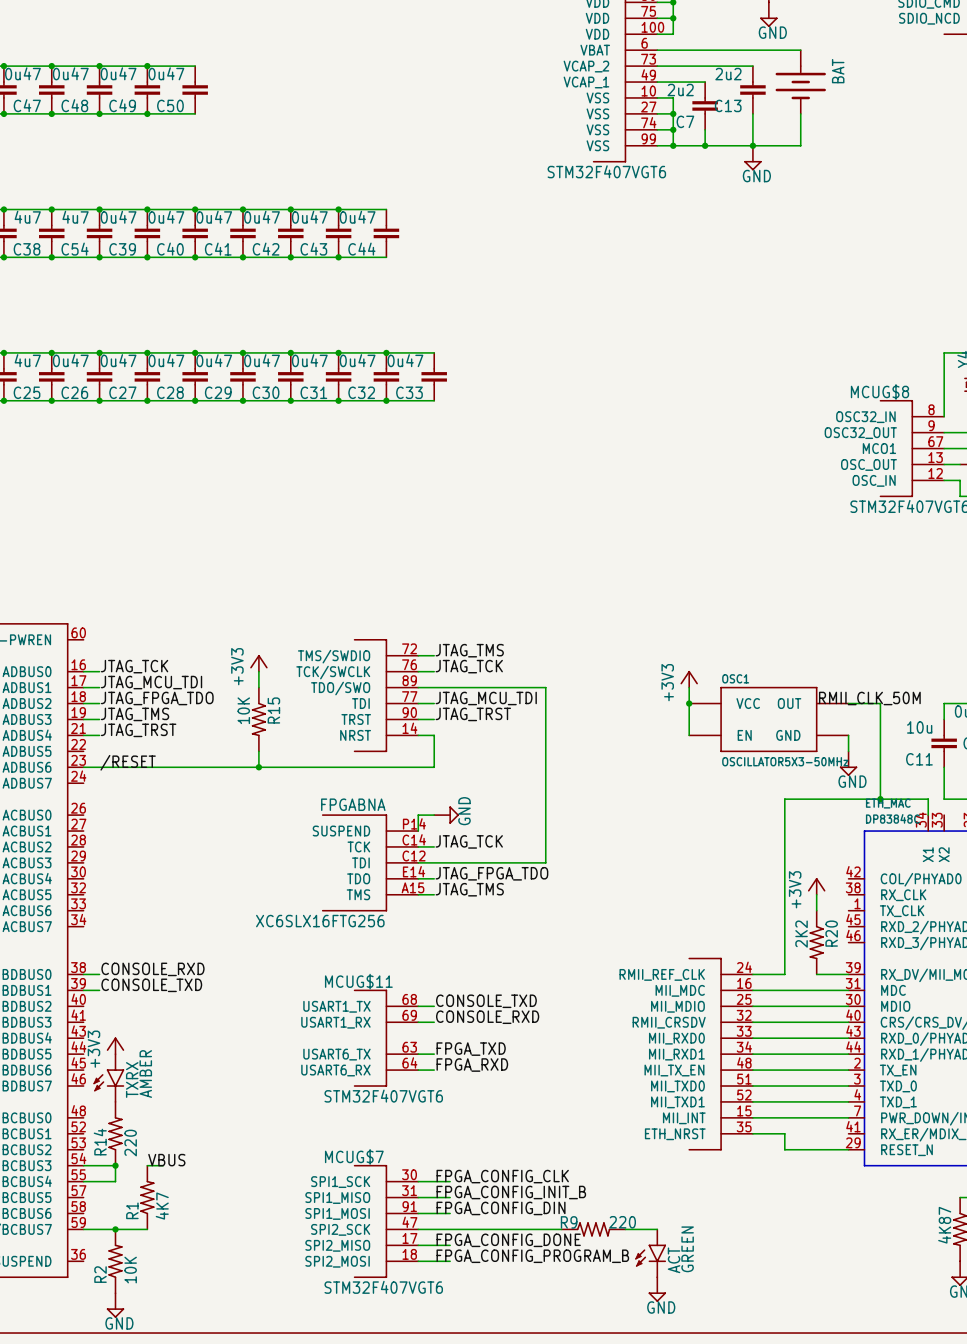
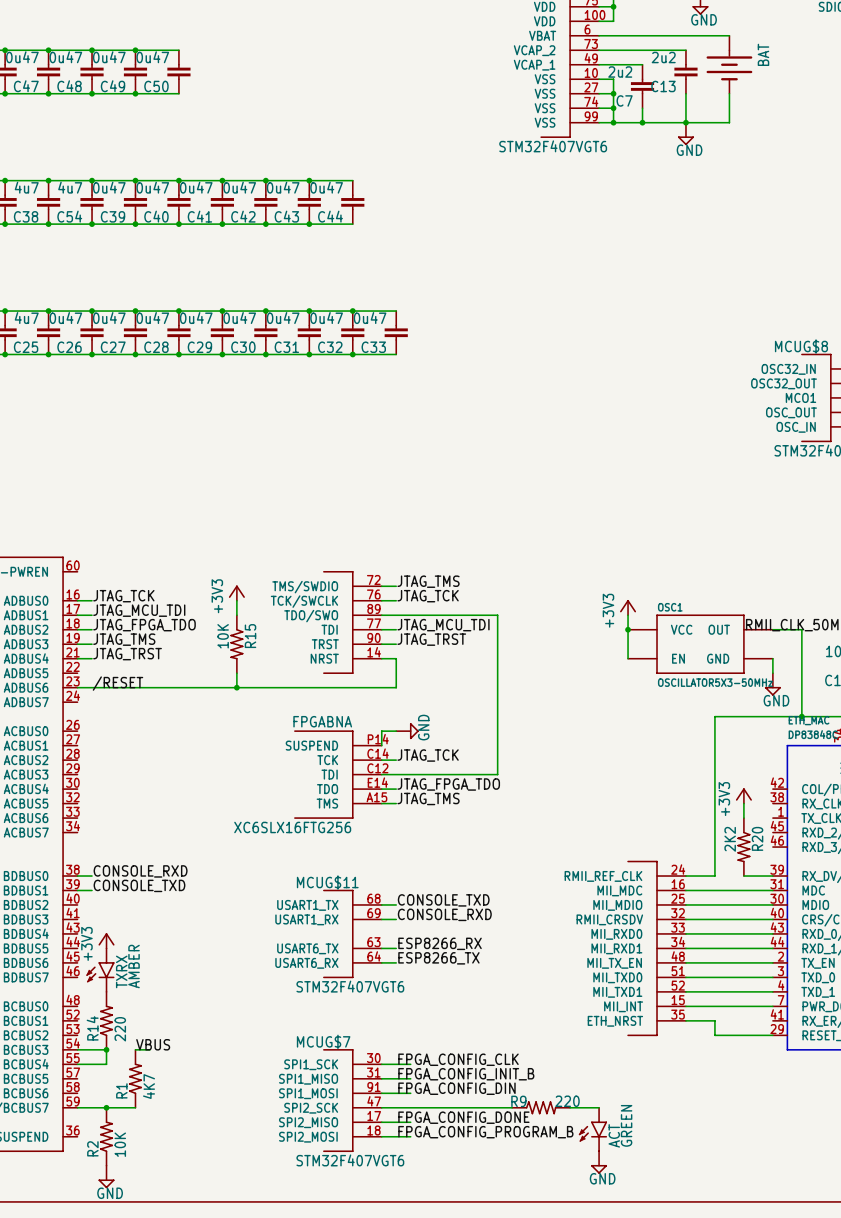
label: FPGA_TXD (471, 1049) -> ESP8266_RX (440, 943)
label: FPGA_RXD (472, 1065) -> ESP8266_TX (438, 958)

